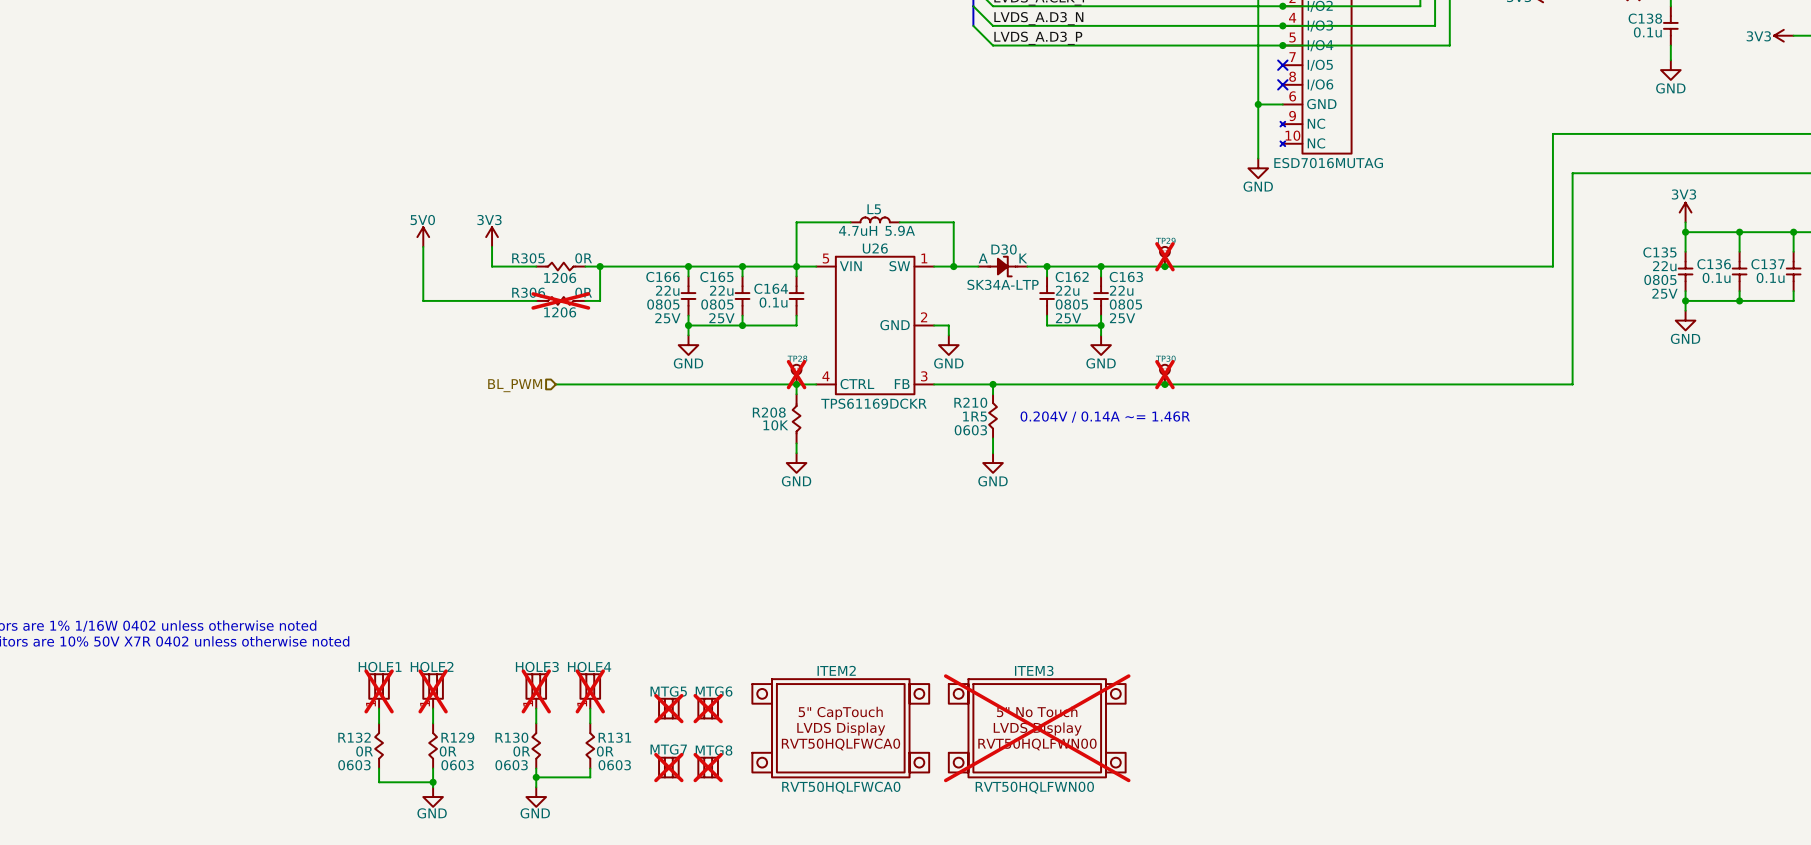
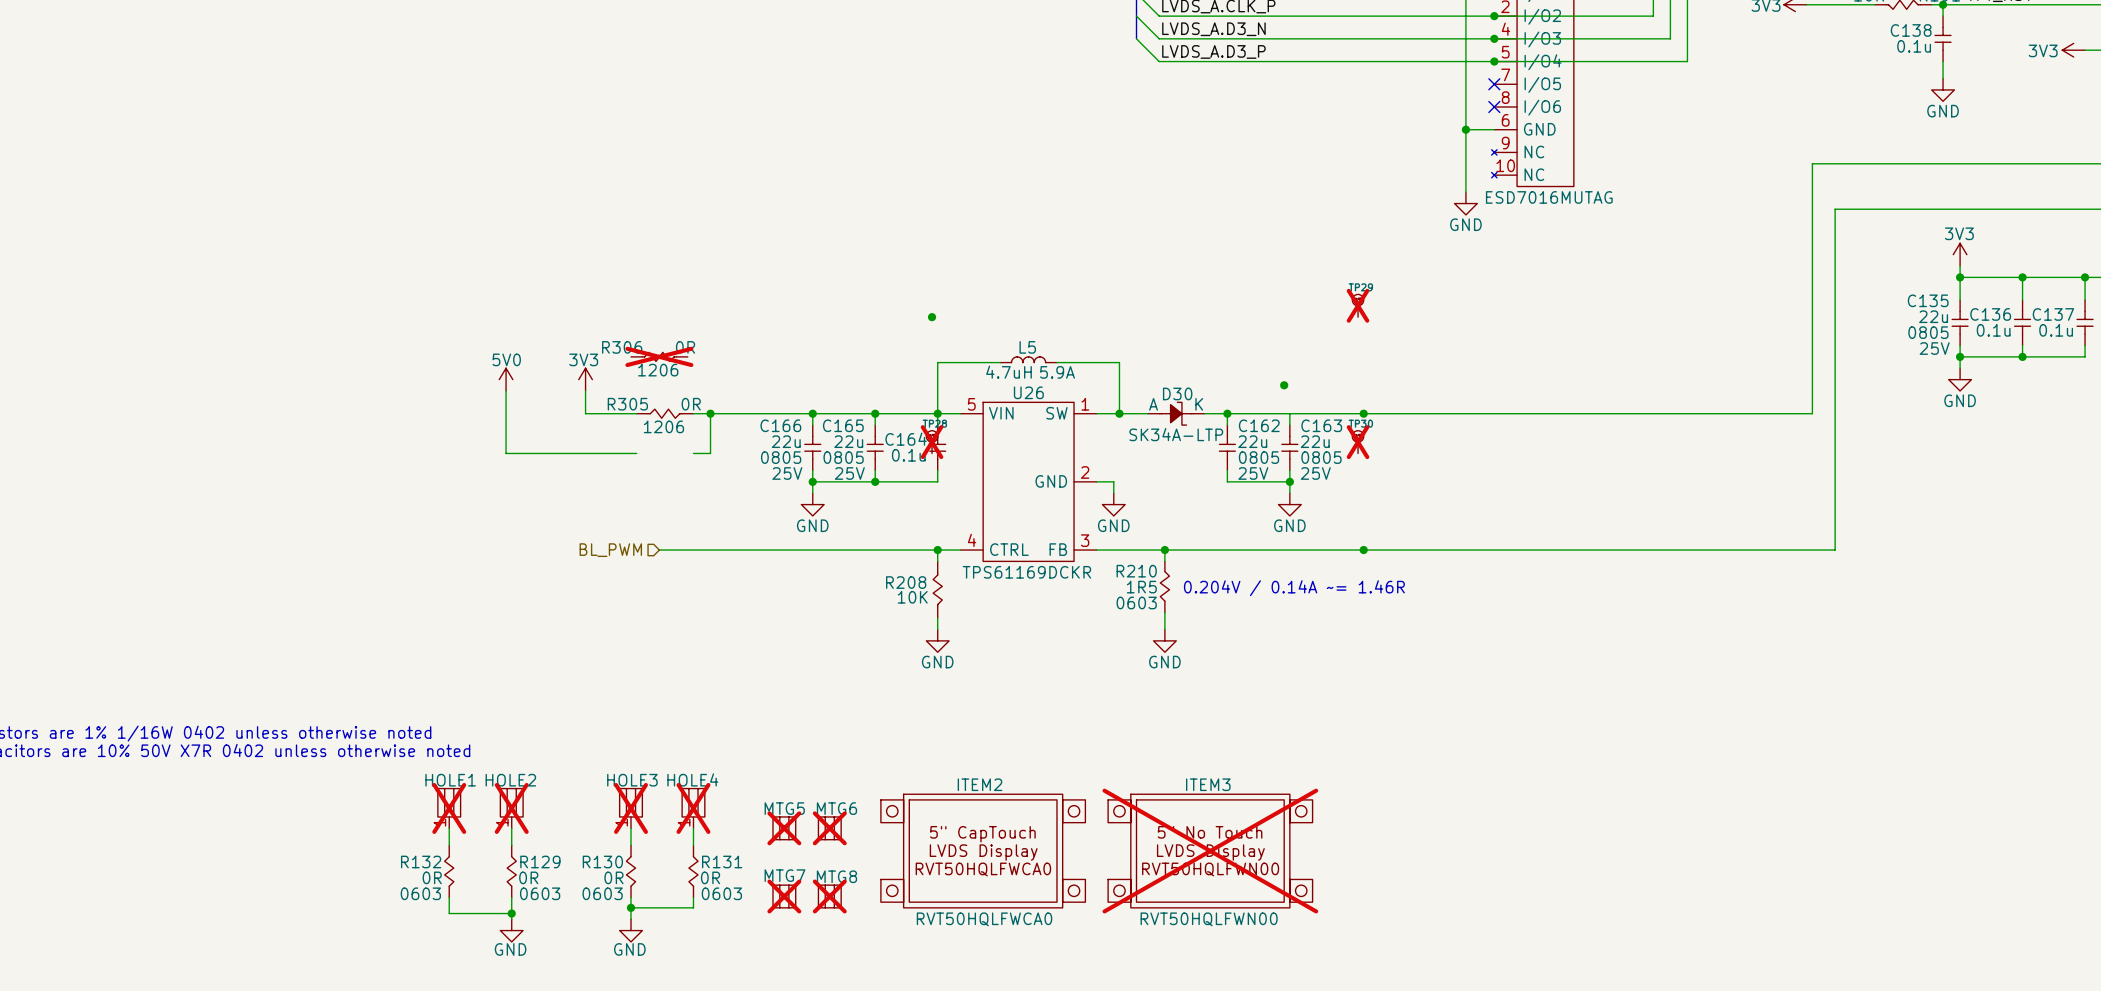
wire: (1557, 133) (1552, 133) (1552, 266) (1027, 266) -> (1812, 163) (1812, 413) (1204, 413)
wire: (1577, 173) (1572, 173) (1572, 384) (934, 384) -> (1835, 209) (1835, 550) (1096, 550)
L5 position: (875, 219) -> (1028, 359)
wire: (850, 222) (796, 222) (796, 276) -> (1000, 362) (937, 362) (937, 425)
wire: (899, 222) (953, 222) (953, 266) -> (1056, 362) (1119, 362) (1119, 413)
power symbol position: 5V0 (423, 237) -> 5V0 (506, 379)
power symbol position: 3V3 (492, 237) -> 3V3 (585, 379)
wire: (423, 246) (423, 300) (536, 300) -> (506, 390) (506, 453) (636, 453)
wire: (492, 246) (492, 266) (536, 266) -> (585, 390) (585, 413) (636, 413)
R305 position: (560, 266) -> (665, 413)
wire: (585, 266) (816, 266) -> (693, 413) (960, 413)
wire: (600, 266) (600, 300) (585, 300) -> none
junction: (600, 266) -> none
wire: (688, 266) (688, 276) -> (812, 413) (812, 425)
junction: (688, 266) -> none
wire: (742, 266) (742, 276) -> (875, 413) (875, 425)
junction: (742, 266) -> none
wire: (934, 266) (978, 266) -> (1096, 413) (1147, 413)
junction: (953, 266) -> none
D30 position: (1002, 266) -> (1176, 413)
wire: (1047, 266) (1047, 276) -> (1227, 413) (1227, 425)
junction: (1047, 266) -> none
wire: (1101, 266) (1101, 276) -> (1289, 413) (1289, 425)
junction: (1101, 266) -> none
junction: (1164, 266) -> none
C166 position: (688, 296) -> (812, 447)
C165 position: (742, 296) -> (875, 447)
C164 position: (796, 296) -> (937, 447)
C162 position: (1047, 296) -> (1227, 447)
C163 position: (1101, 296) -> (1289, 447)
wire: (688, 315) (688, 335) -> (812, 470) (812, 493)
wire: (742, 315) (742, 325) -> (875, 470) (875, 481)
wire: (796, 315) (796, 325) (688, 325) -> (937, 470) (937, 481) (812, 481)
wire: (1047, 315) (1047, 325) (1101, 325) -> (1227, 470) (1227, 481) (1289, 481)
wire: (1101, 315) (1101, 335) -> (1289, 470) (1289, 493)
junction position: (688, 325) -> (812, 413)
junction position: (742, 325) -> (875, 413)
U26 position: (875, 325) -> (1028, 481)
wire: (934, 325) (948, 325) (948, 335) -> (1096, 481) (1113, 481) (1113, 493)
power symbol: GND (688, 345) -> none
power symbol: GND (948, 345) -> none
power symbol: GND (1101, 345) -> none
junction: none -> (710, 413)
junction: none -> (937, 413)
junction: none -> (1119, 413)
junction: none -> (1227, 413)
junction: none -> (1363, 413)
wire: (555, 384) (590, 384) -> none
wire: (605, 384) (816, 384) -> (710, 453) (710, 413)
wire: (796, 384) (796, 394) -> (937, 550) (937, 561)
junction: (796, 384) -> none
wire: (993, 384) (993, 394) -> (1164, 550) (1164, 561)
junction: (993, 384) -> none
junction: (1164, 384) -> none
hierarchical label position: BL_PWM (515, 385) -> BL_PWM (610, 550)
junction: none -> (812, 481)
junction: none -> (875, 481)
junction: none -> (1289, 481)
R210 position: (993, 416) -> (1164, 586)
text position: 0.204V / 0.14A ~= 1.46R (1105, 417) -> 0.204V / 0.14A ~= 1.46R (1294, 588)
R208 position: (796, 418) -> (937, 589)
power symbol: none -> GND (812, 504)
power symbol: none -> GND (1113, 504)
power symbol: none -> GND (1289, 504)
wire: (993, 438) (993, 453) -> (1164, 612) (1164, 629)
wire: (796, 443) (796, 453) -> (937, 618) (937, 629)
power symbol: GND (796, 463) -> none
power symbol: GND (993, 463) -> none
wire: none -> (659, 550) (960, 550)
junction: none -> (937, 550)
junction: none -> (1164, 550)
junction: none -> (1363, 550)
power symbol: none -> GND (937, 640)
power symbol: none -> GND (1164, 640)

